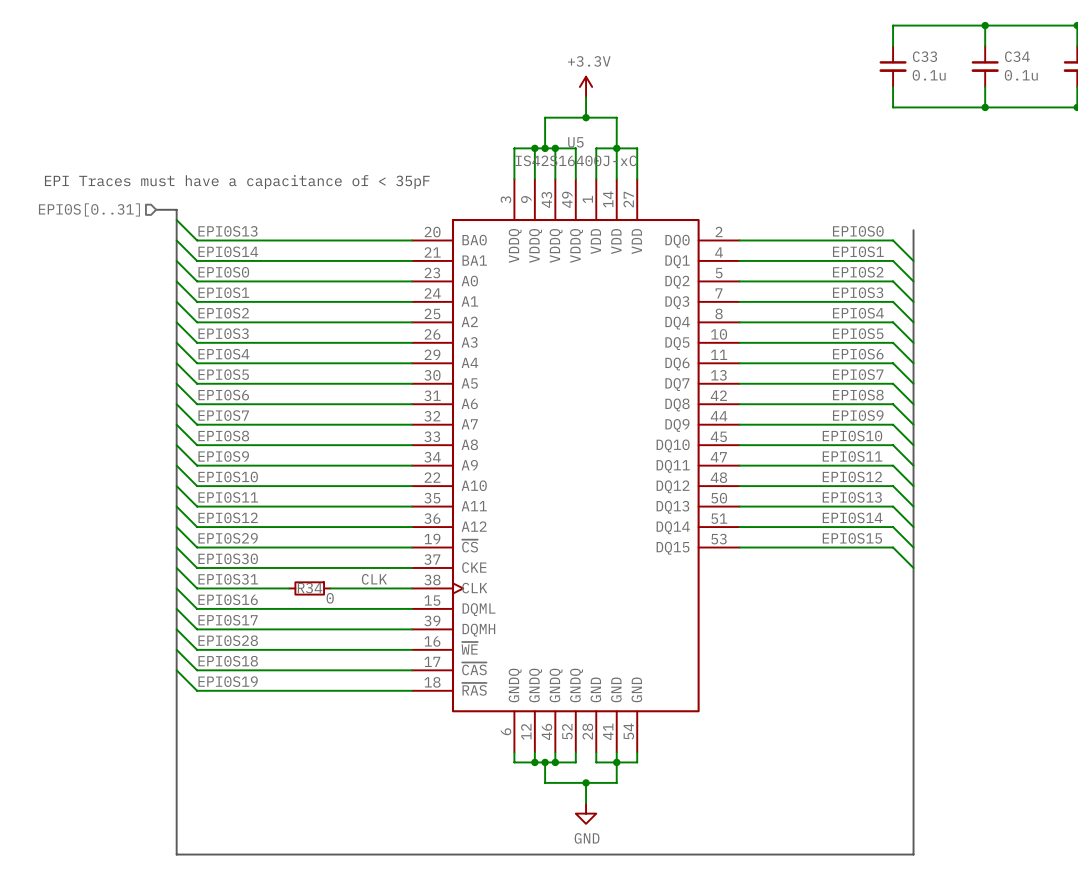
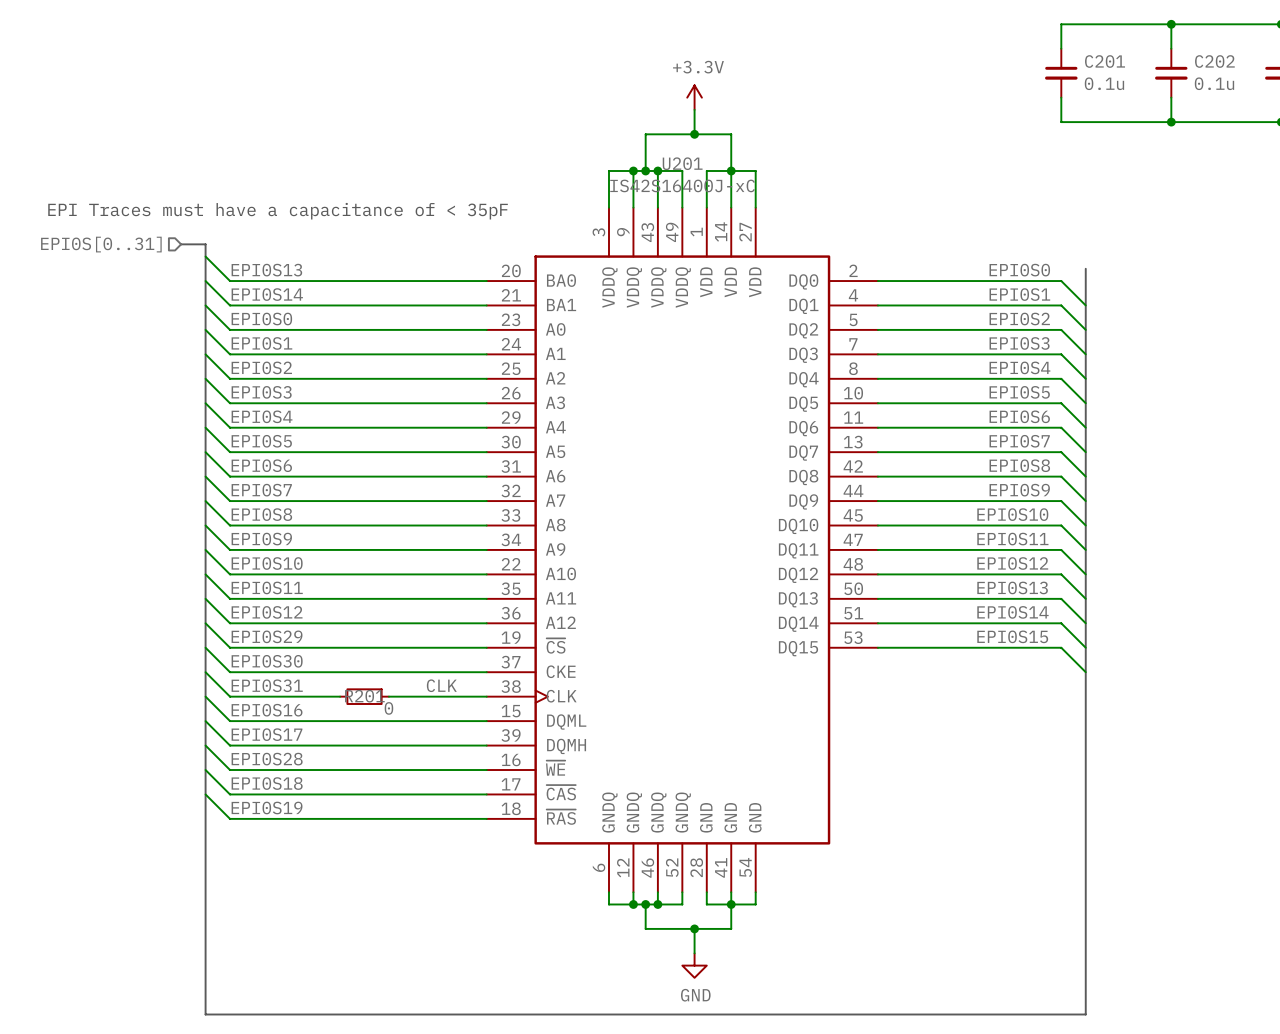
C33 name: C33 (925, 56) -> C201 (1105, 61)
C34 name: C34 (1017, 56) -> C202 (1214, 61)
U5 name: U5 (575, 142) -> U201 (682, 163)
R34 name: R34 (310, 588) -> R201 (364, 696)

